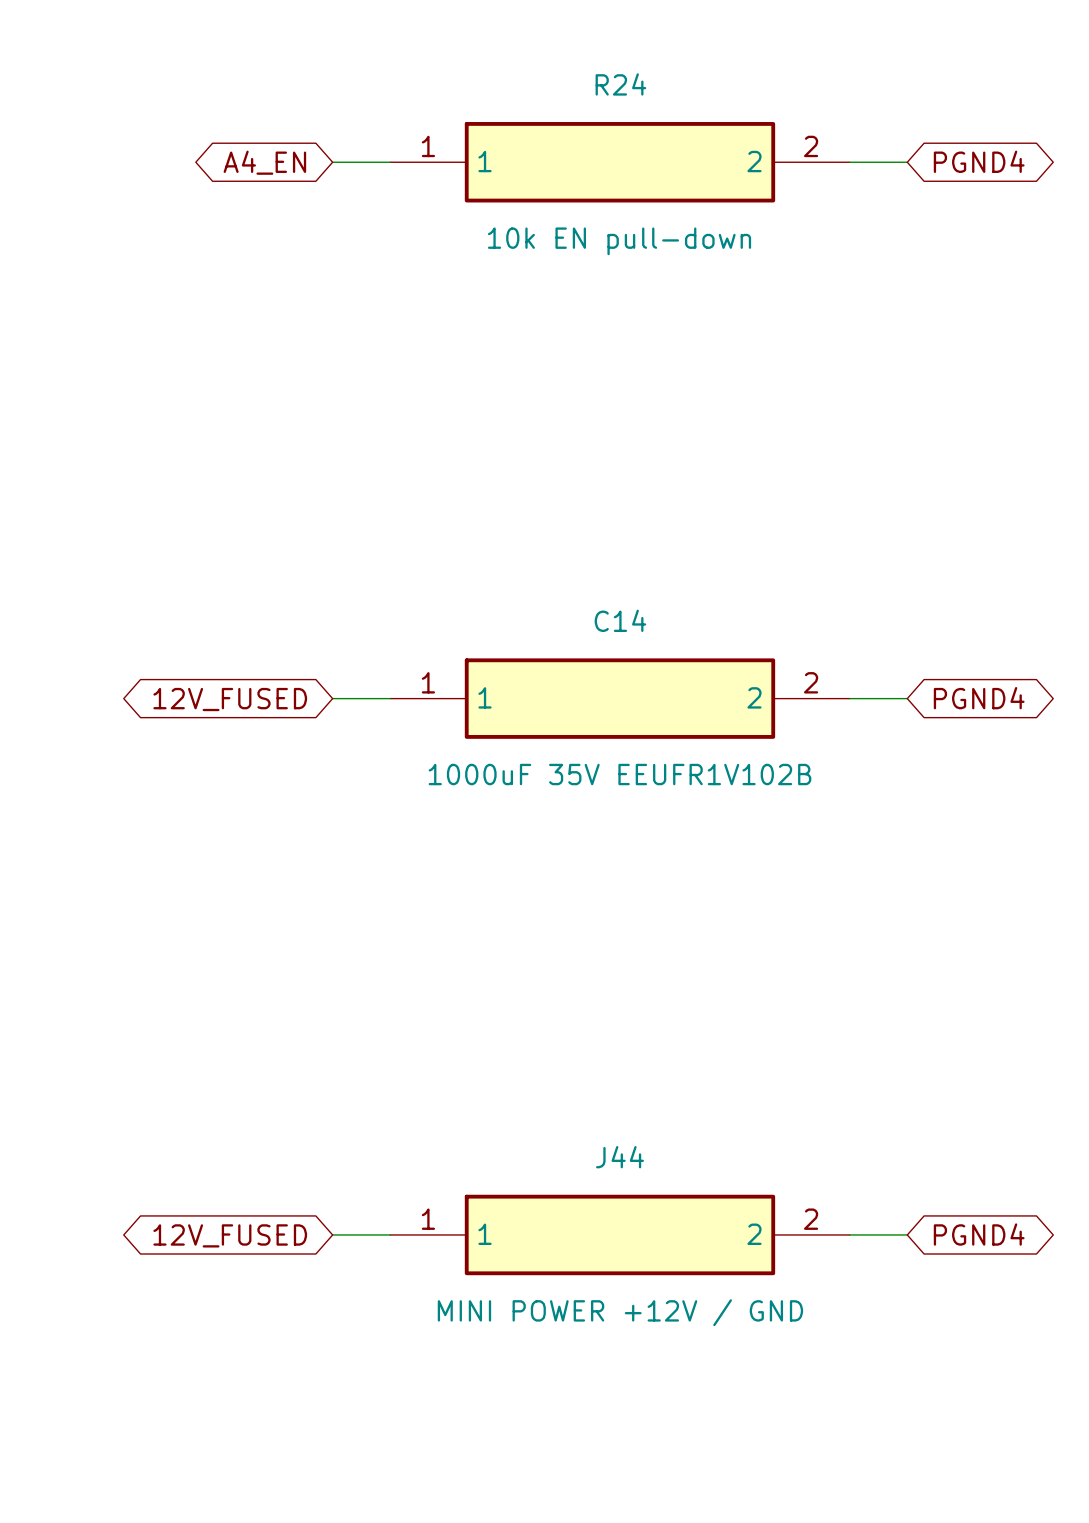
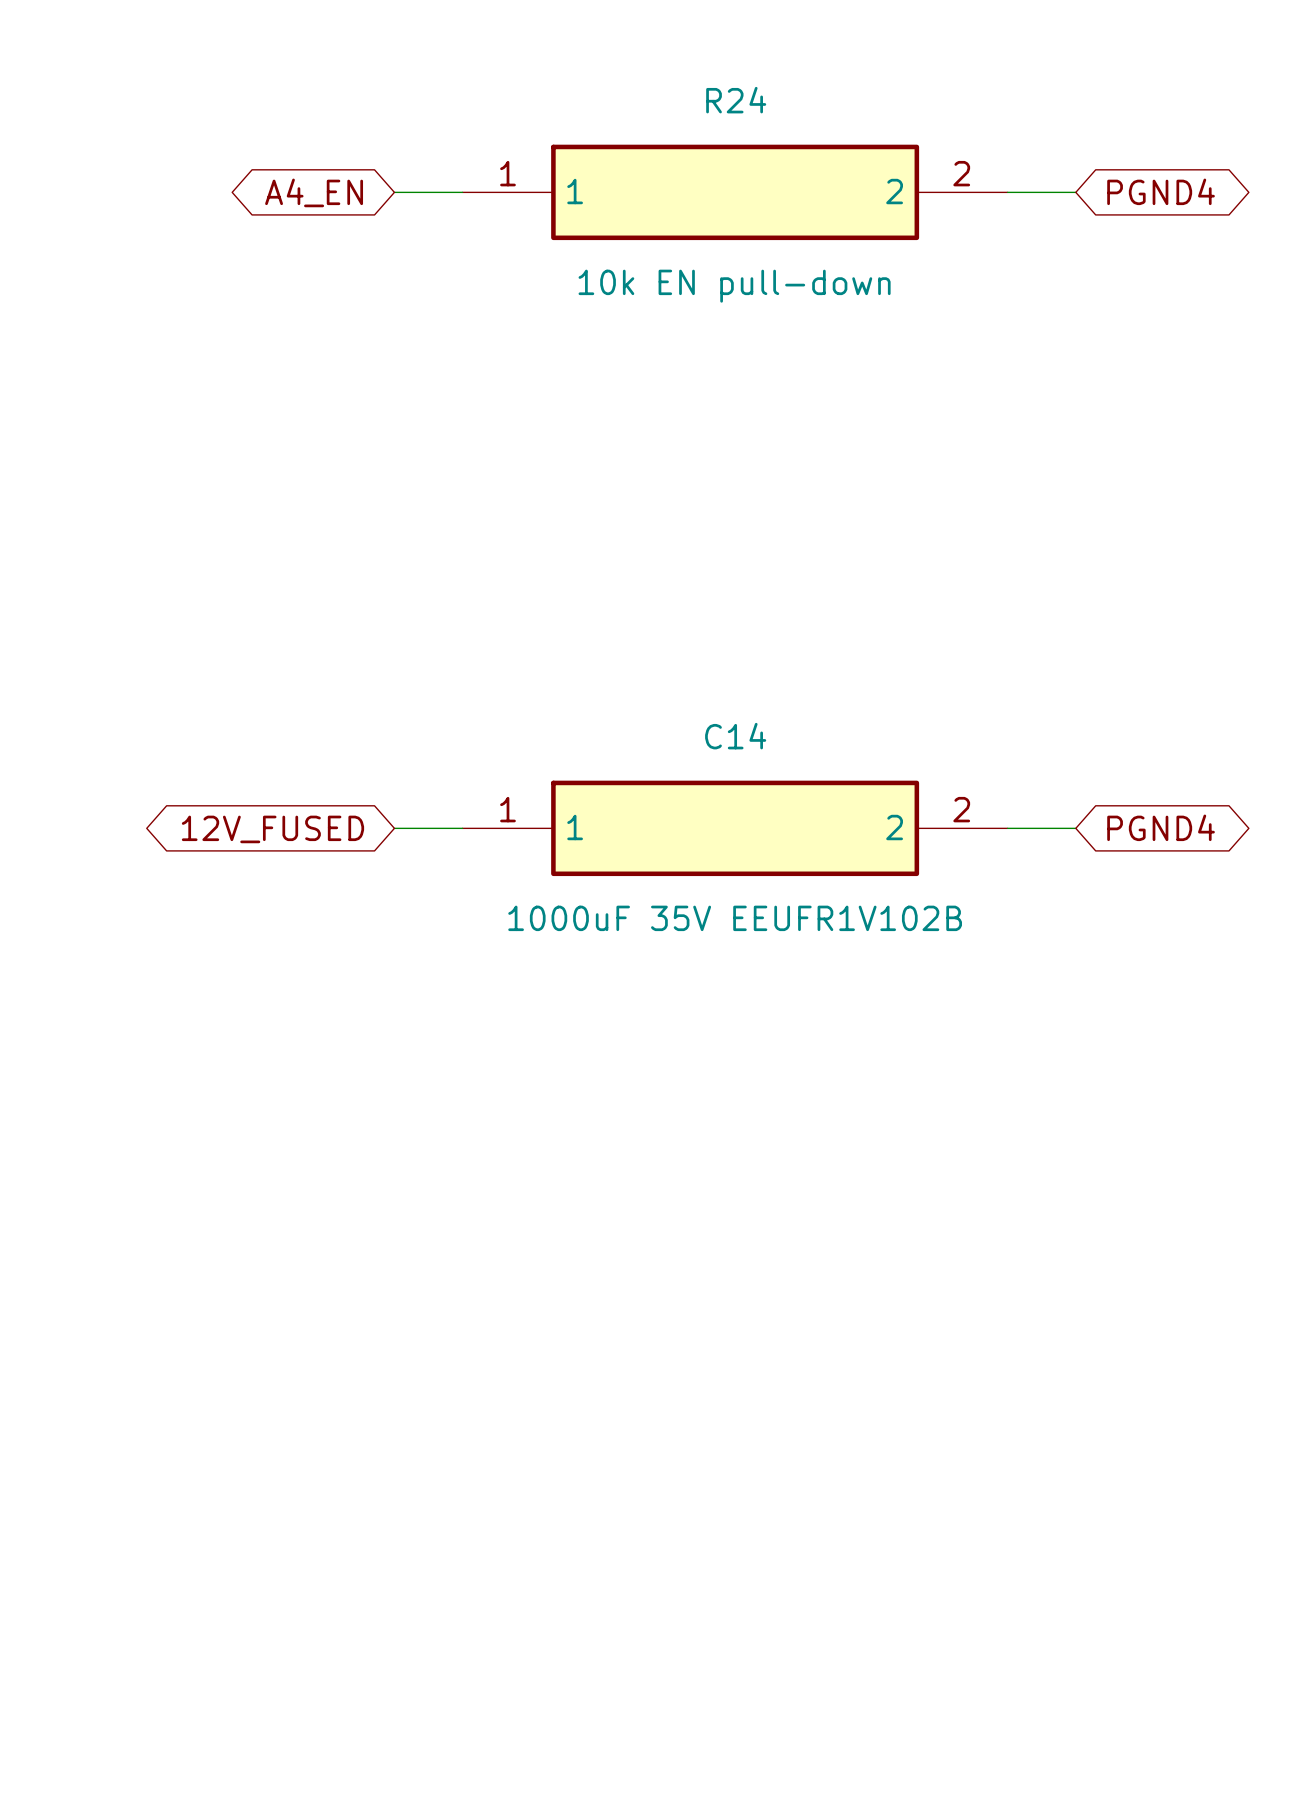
wire: (332, 1234) (390, 1234) -> none
J44: MINI POWER +12V / GND (619, 1234) -> none
wire: (849, 1234) (907, 1234) -> none
global label: PGND4 (979, 1234) -> none
global label: 12V_FUSED (230, 1235) -> none

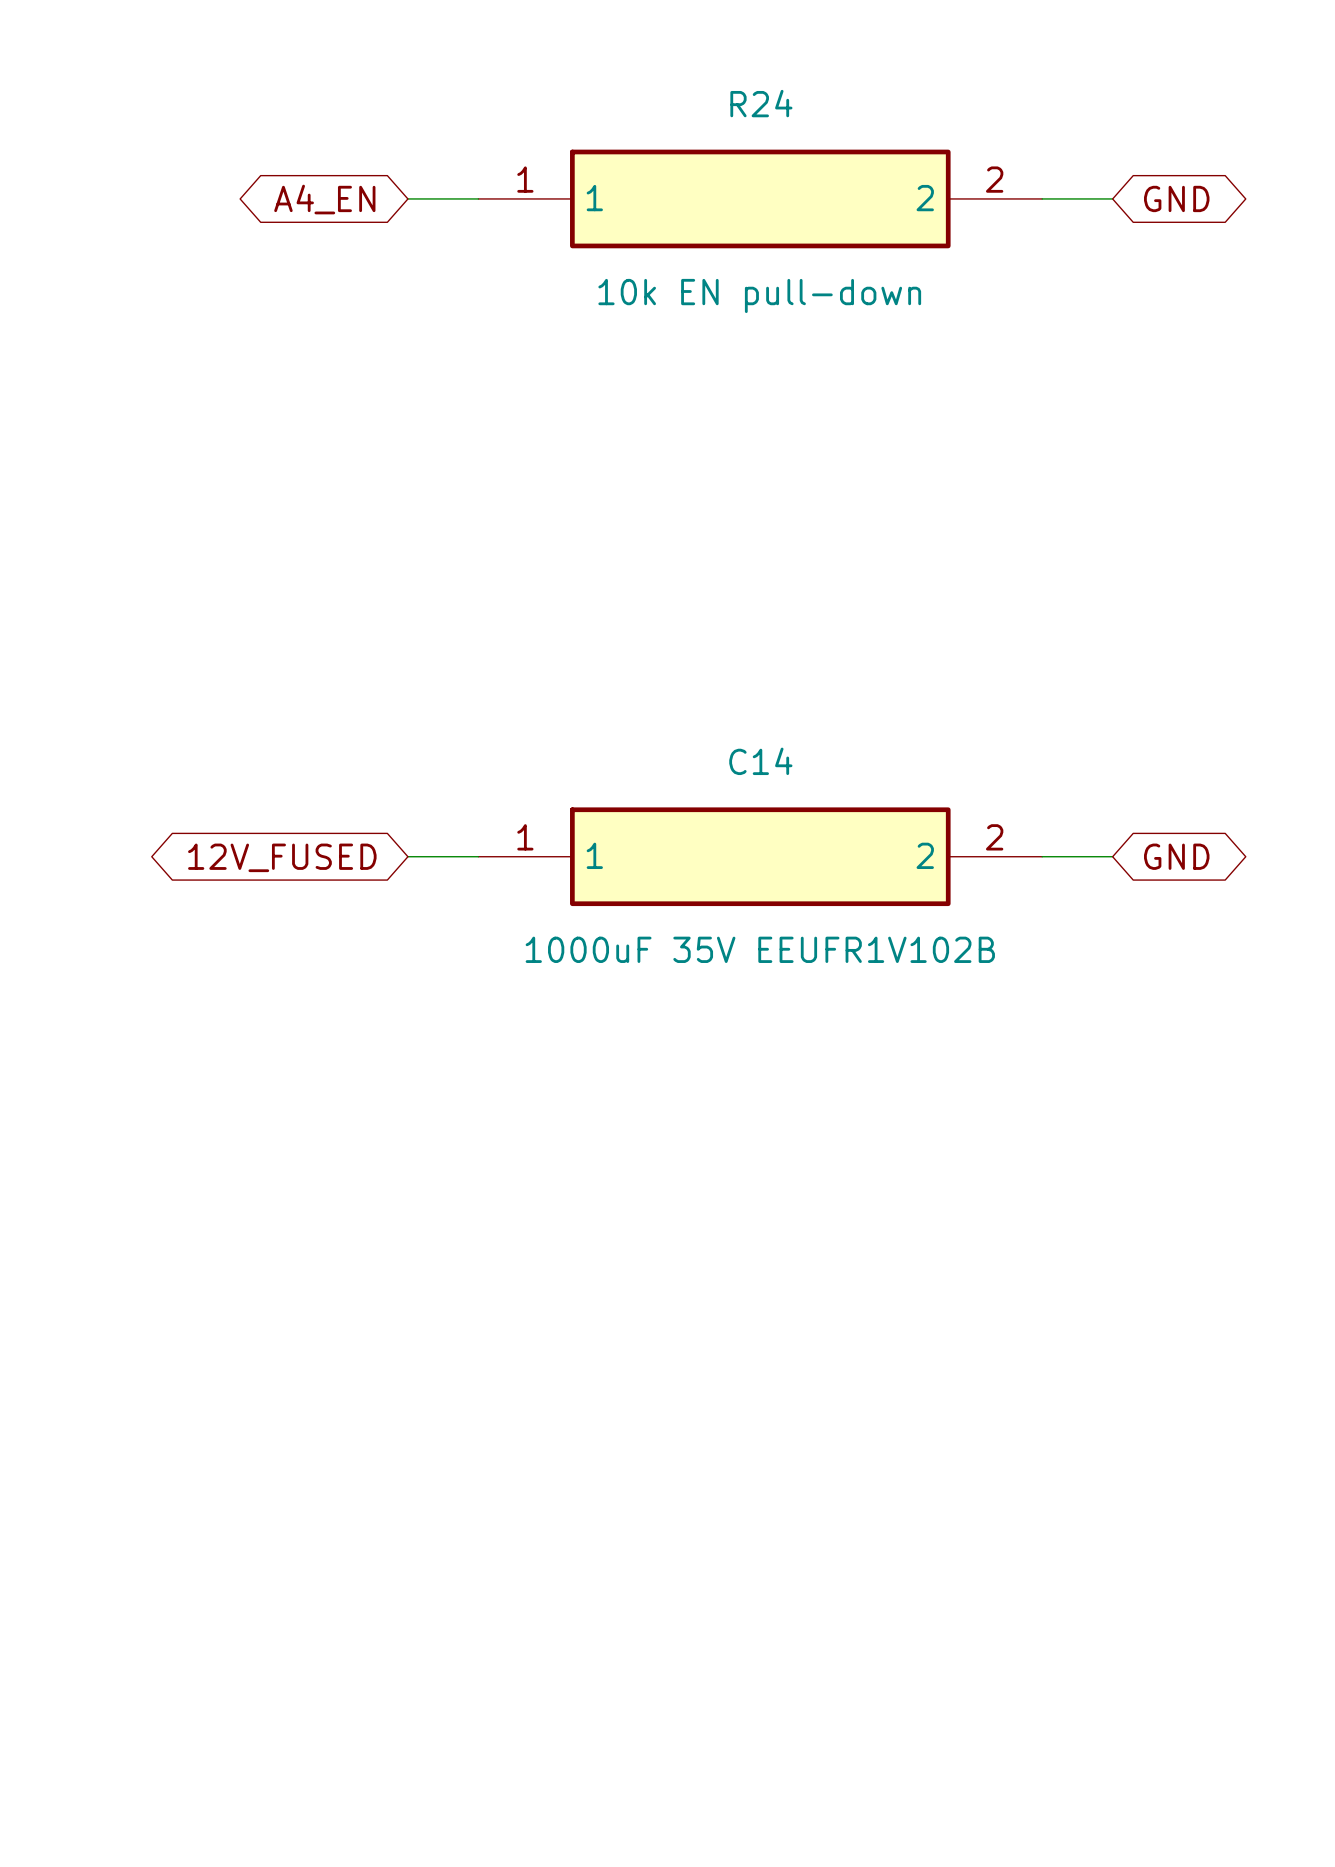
global label: PGND4 (1161, 191) -> GND (1176, 198)
global label: PGND4 (1161, 827) -> GND (1176, 856)

